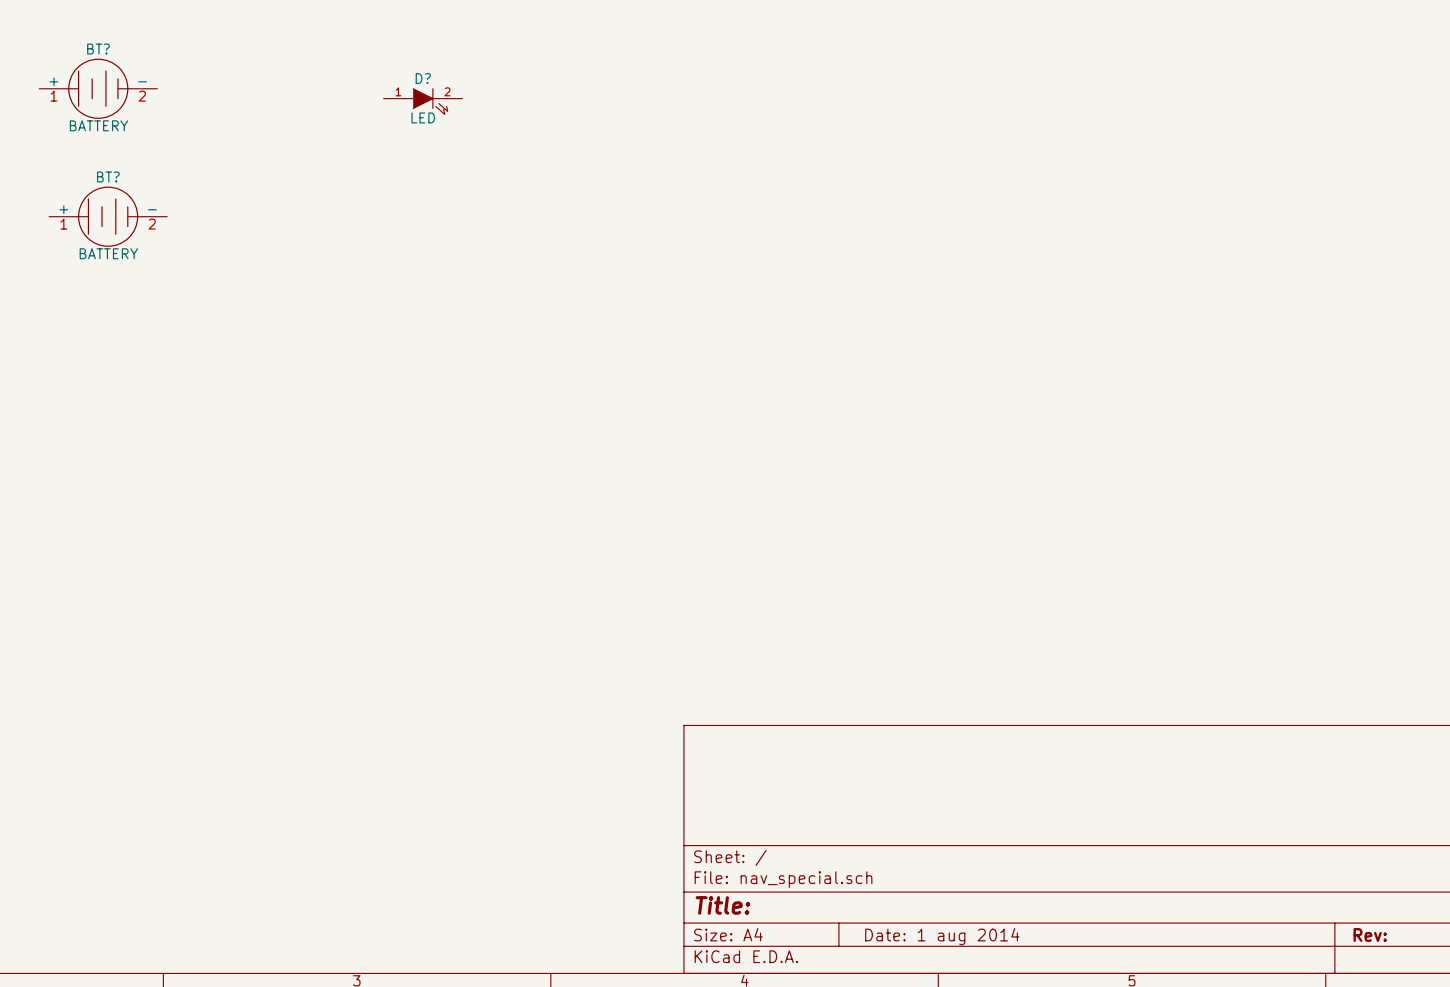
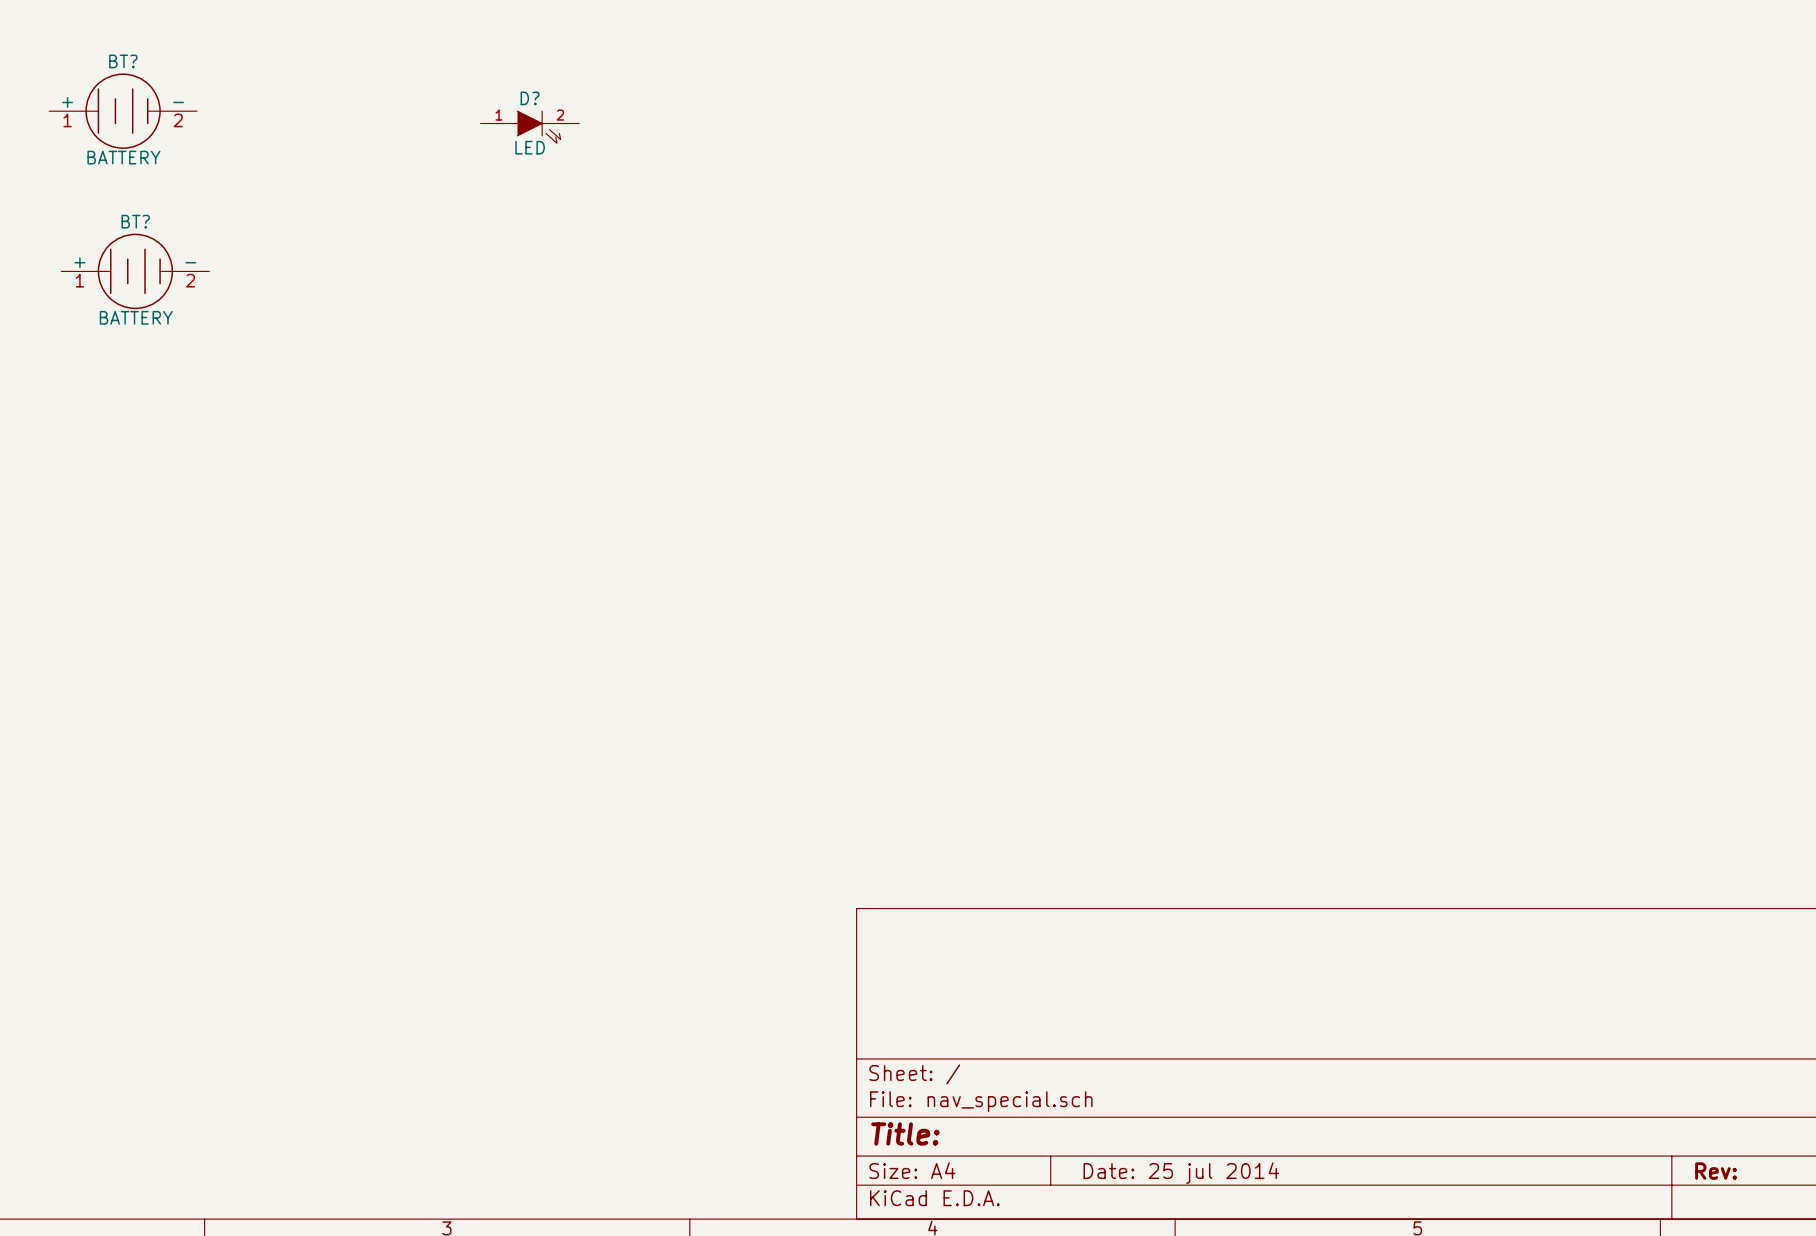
title block: Date: 1 aug 2014 (942, 936) -> Date: 25 jul 2014 (1181, 1173)

